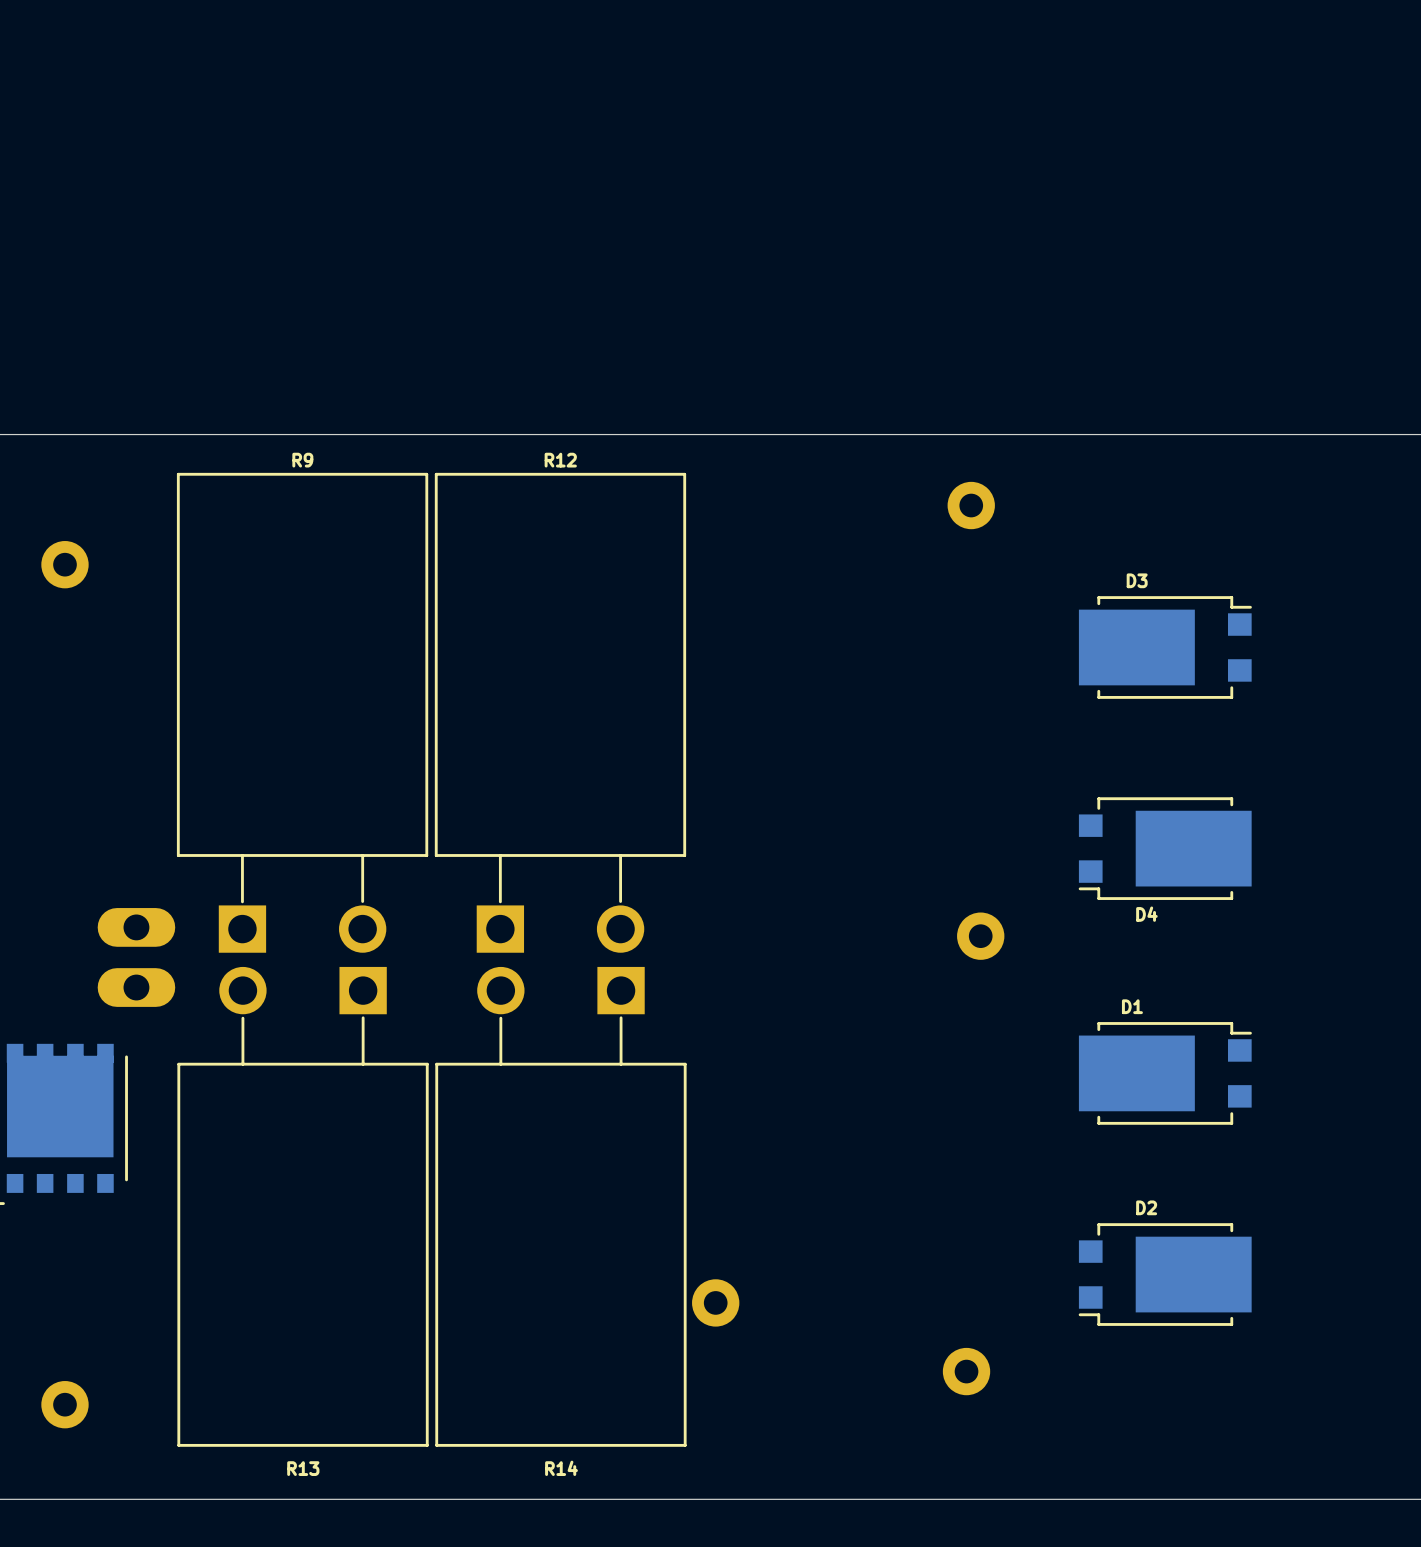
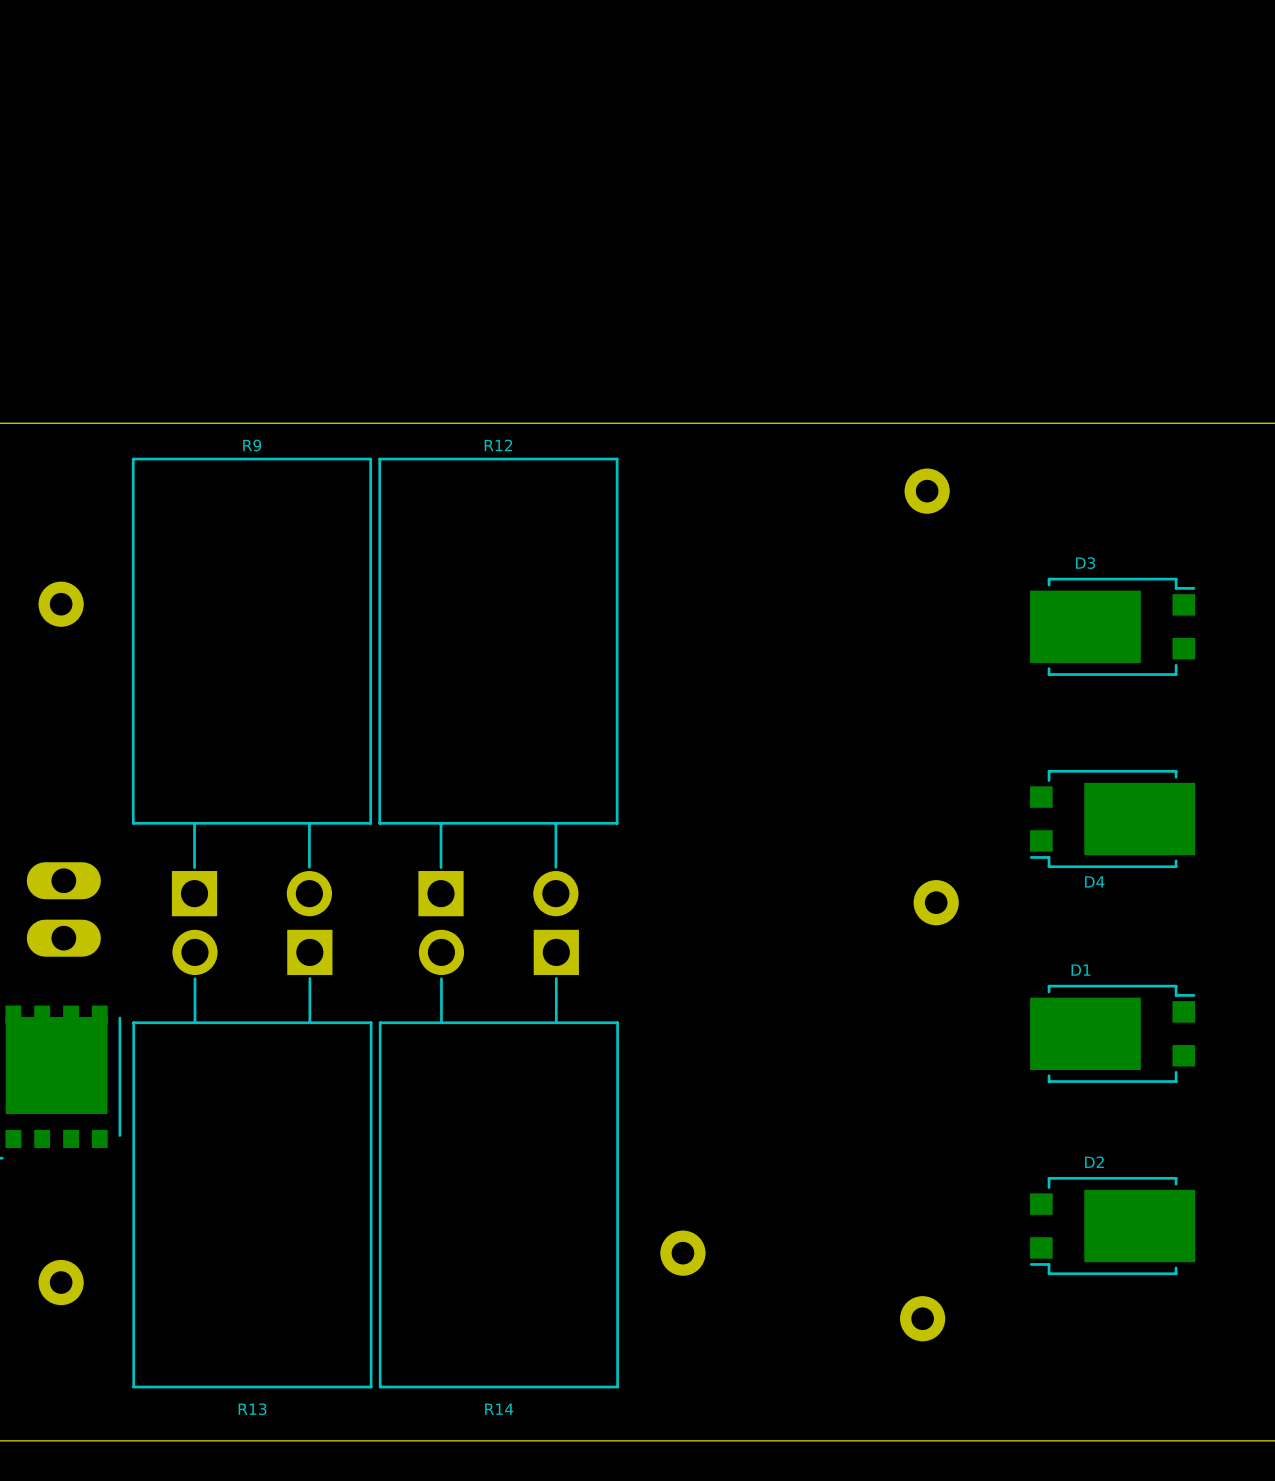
part position: (64, 564) -> (61, 604)
R9 position: (302, 712) -> (251, 686)
R12 position: (560, 712) -> (498, 686)
part position: (136, 957) -> (63, 909)
R13 position: (303, 1206) -> (252, 1159)
R14 position: (560, 1206) -> (498, 1159)
part position: (64, 1404) -> (61, 1282)

